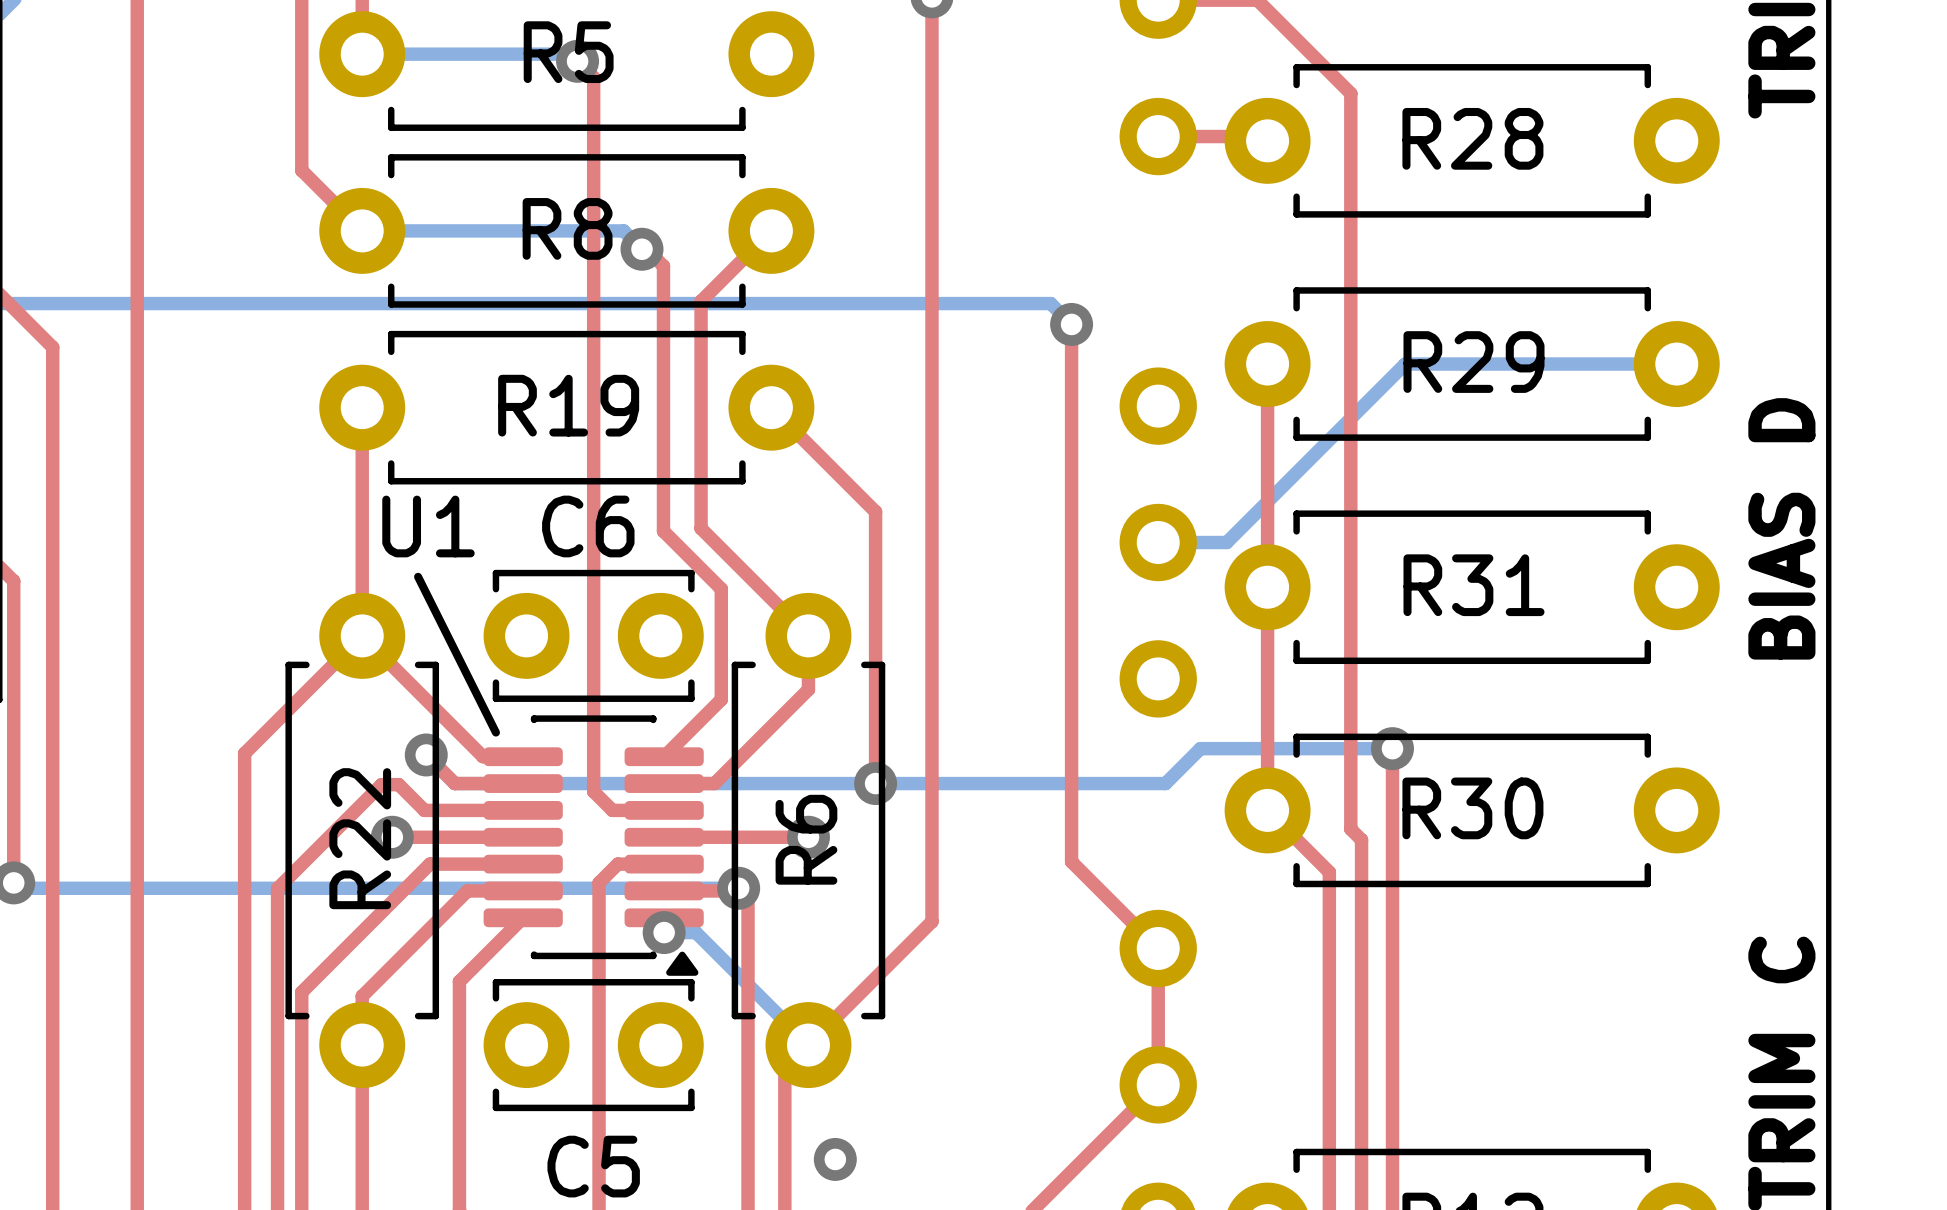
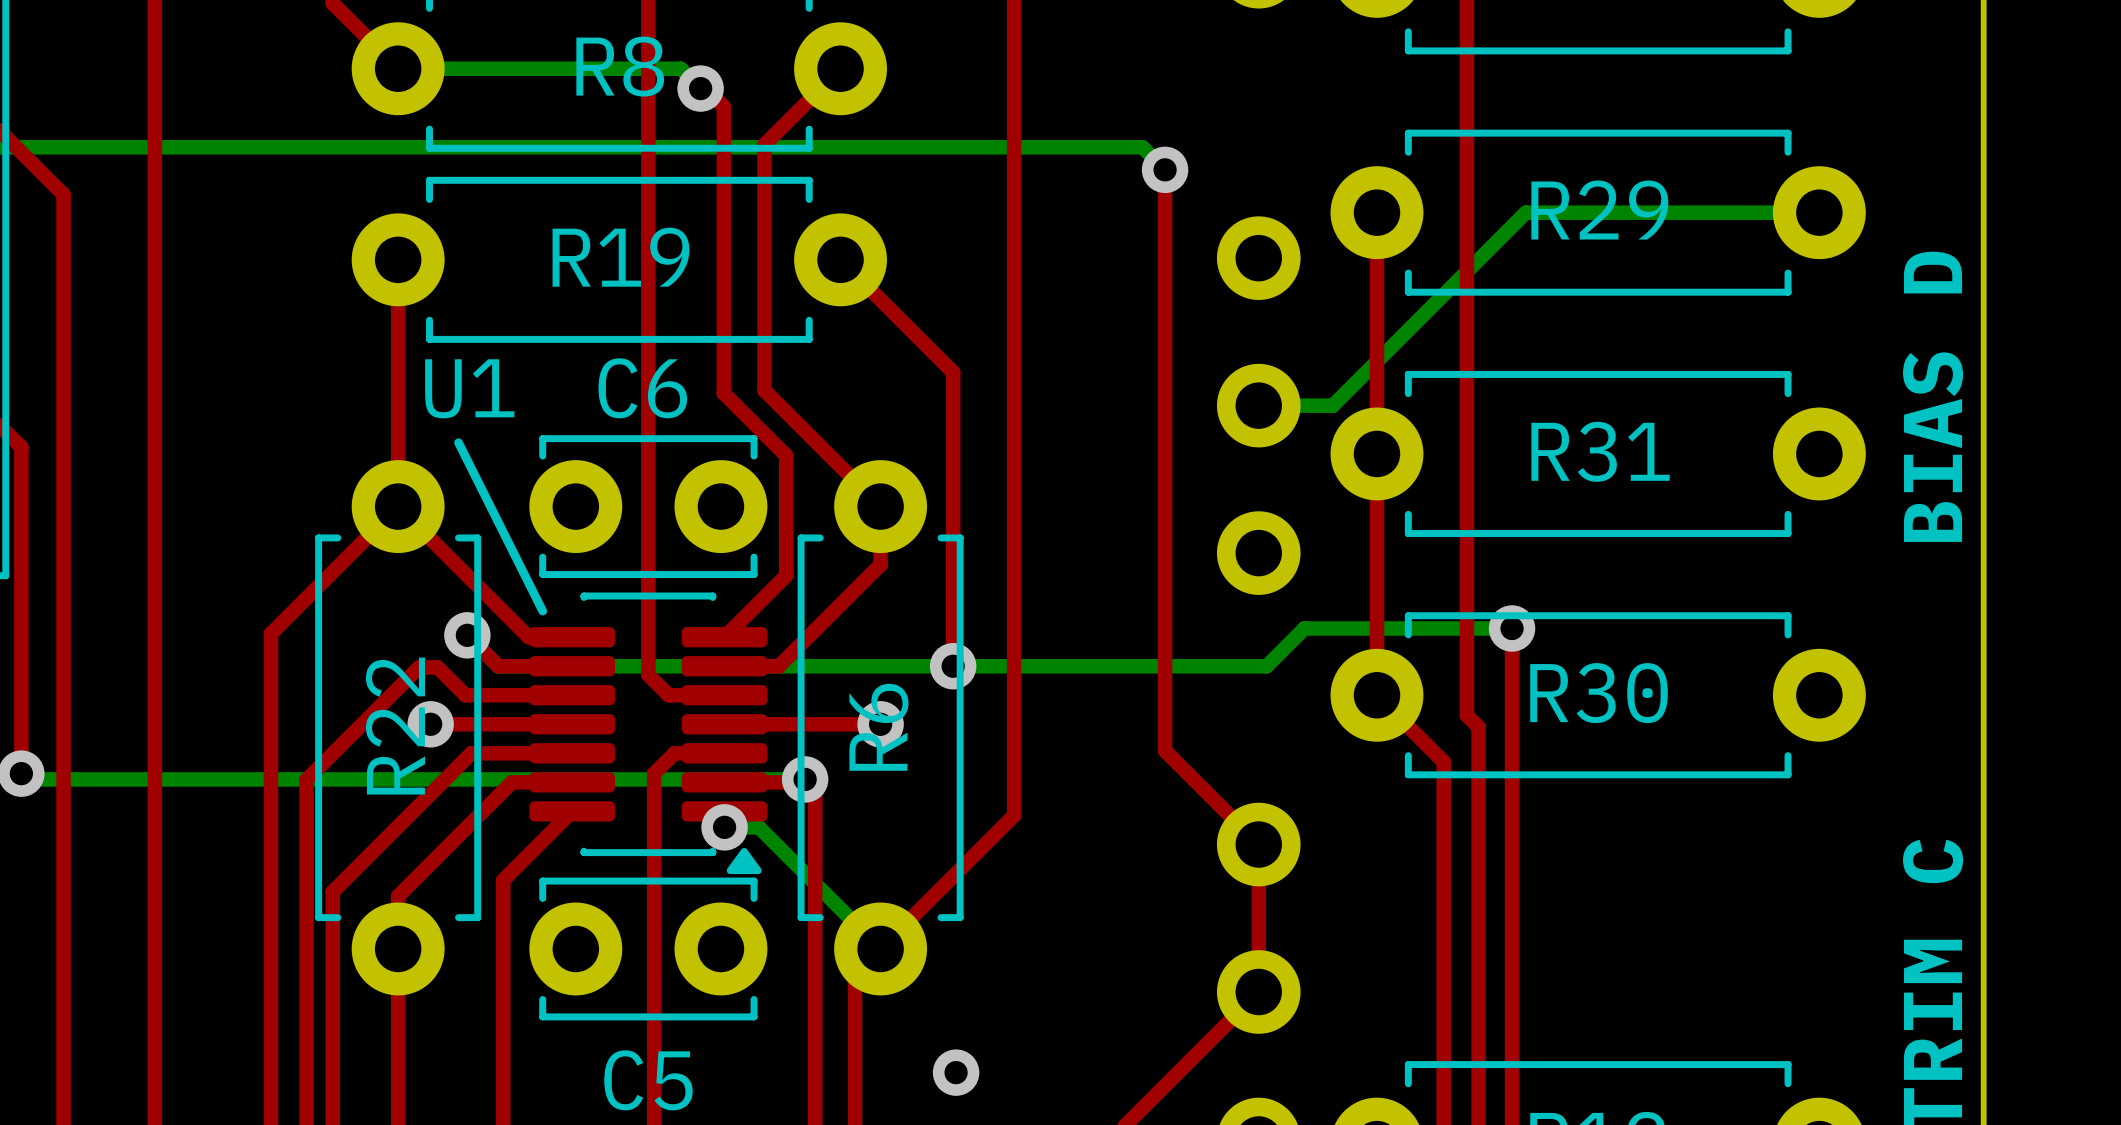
via position: (835, 1159) -> (956, 1072)

